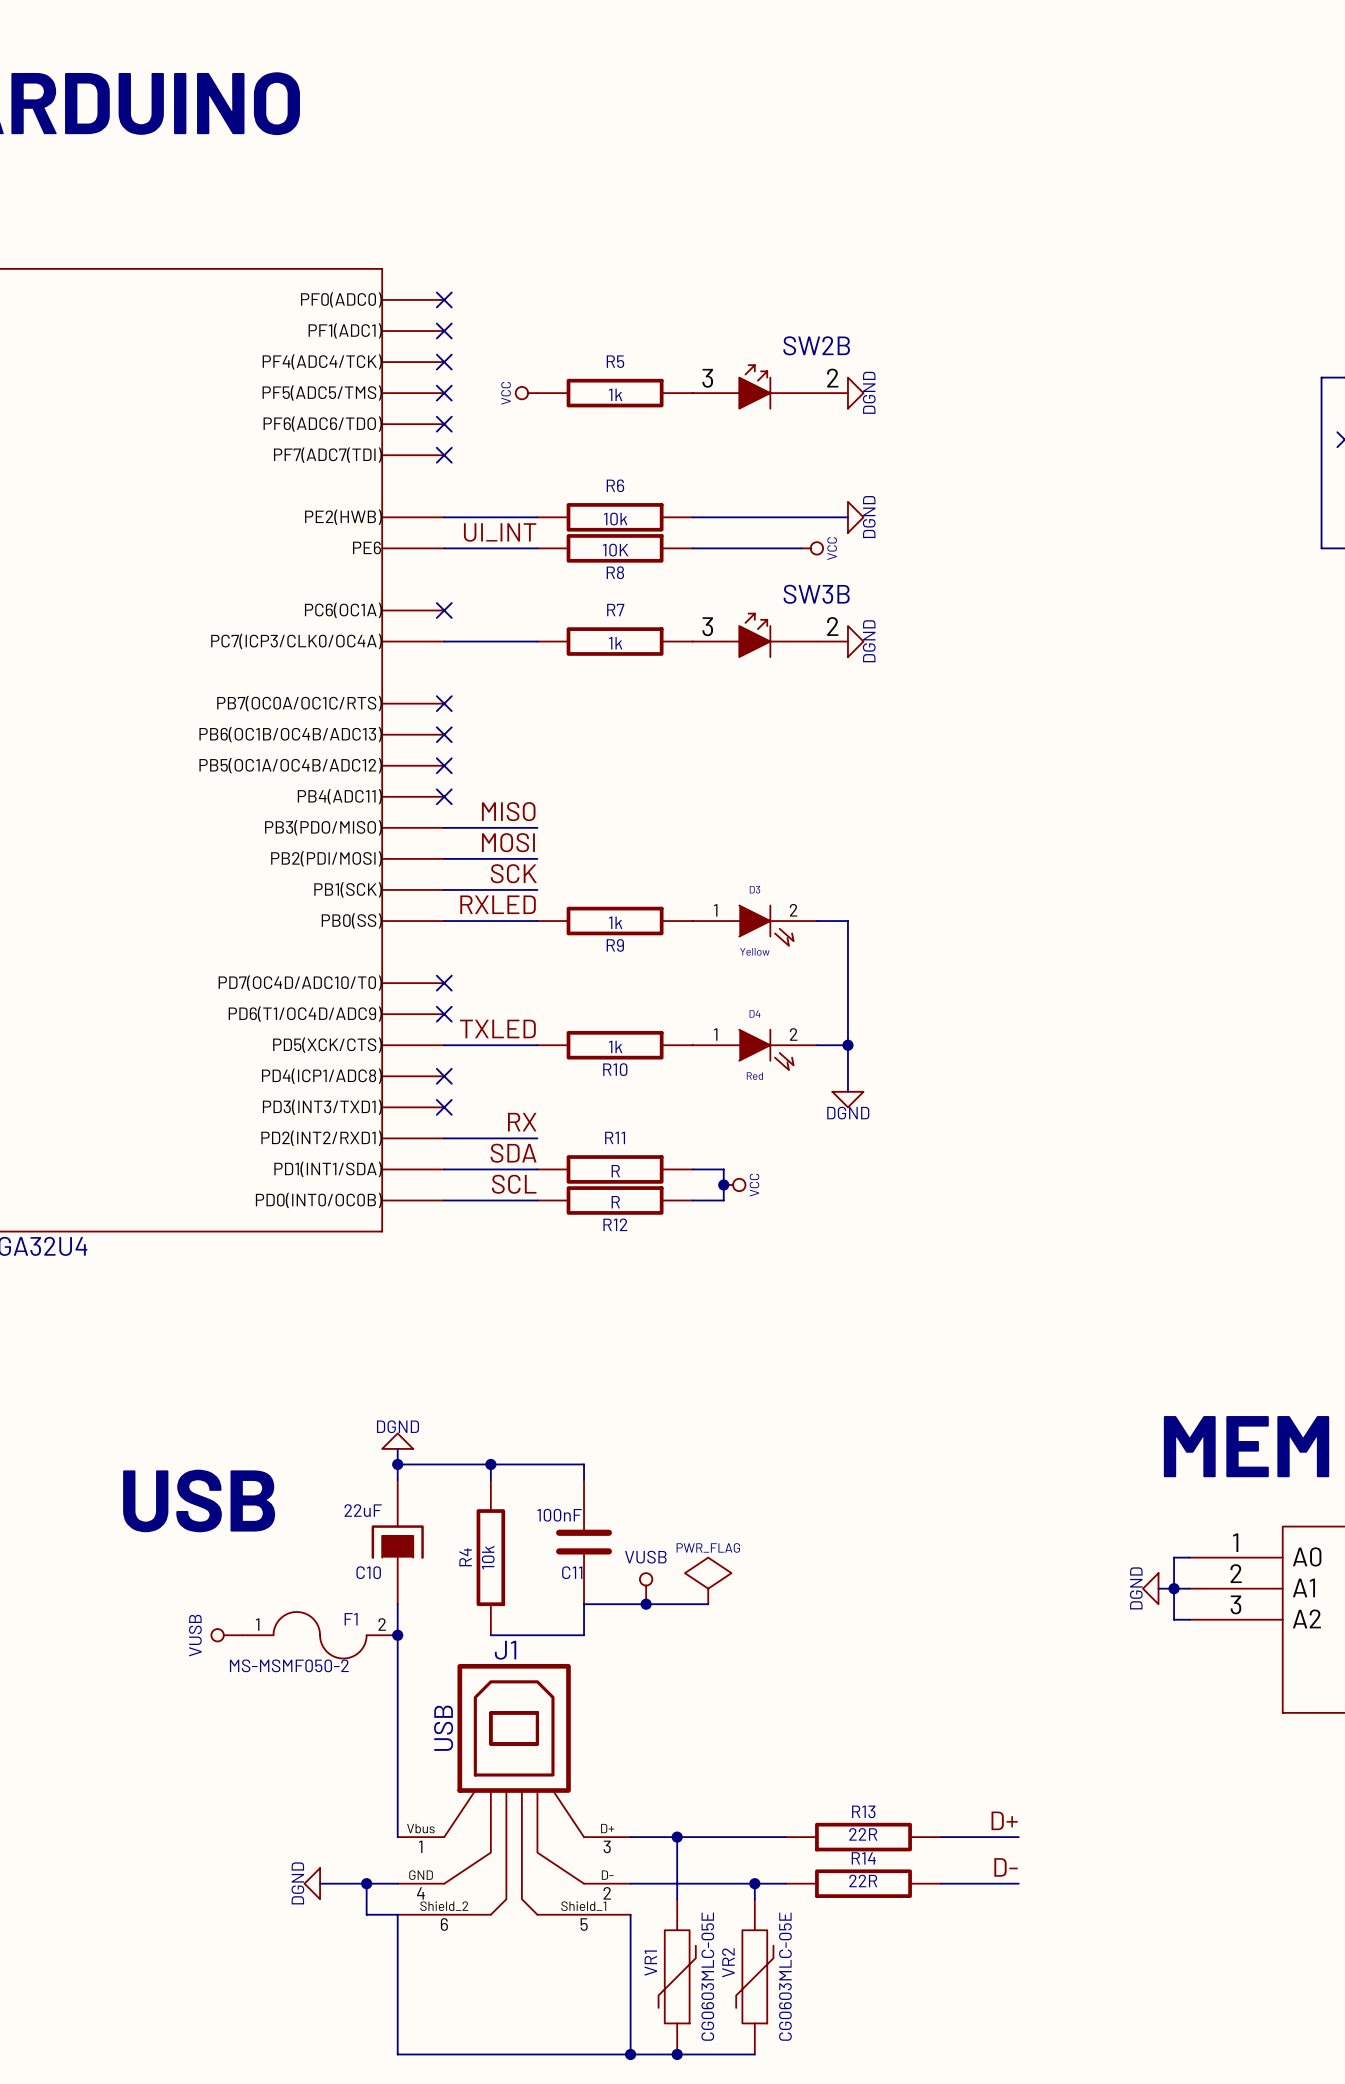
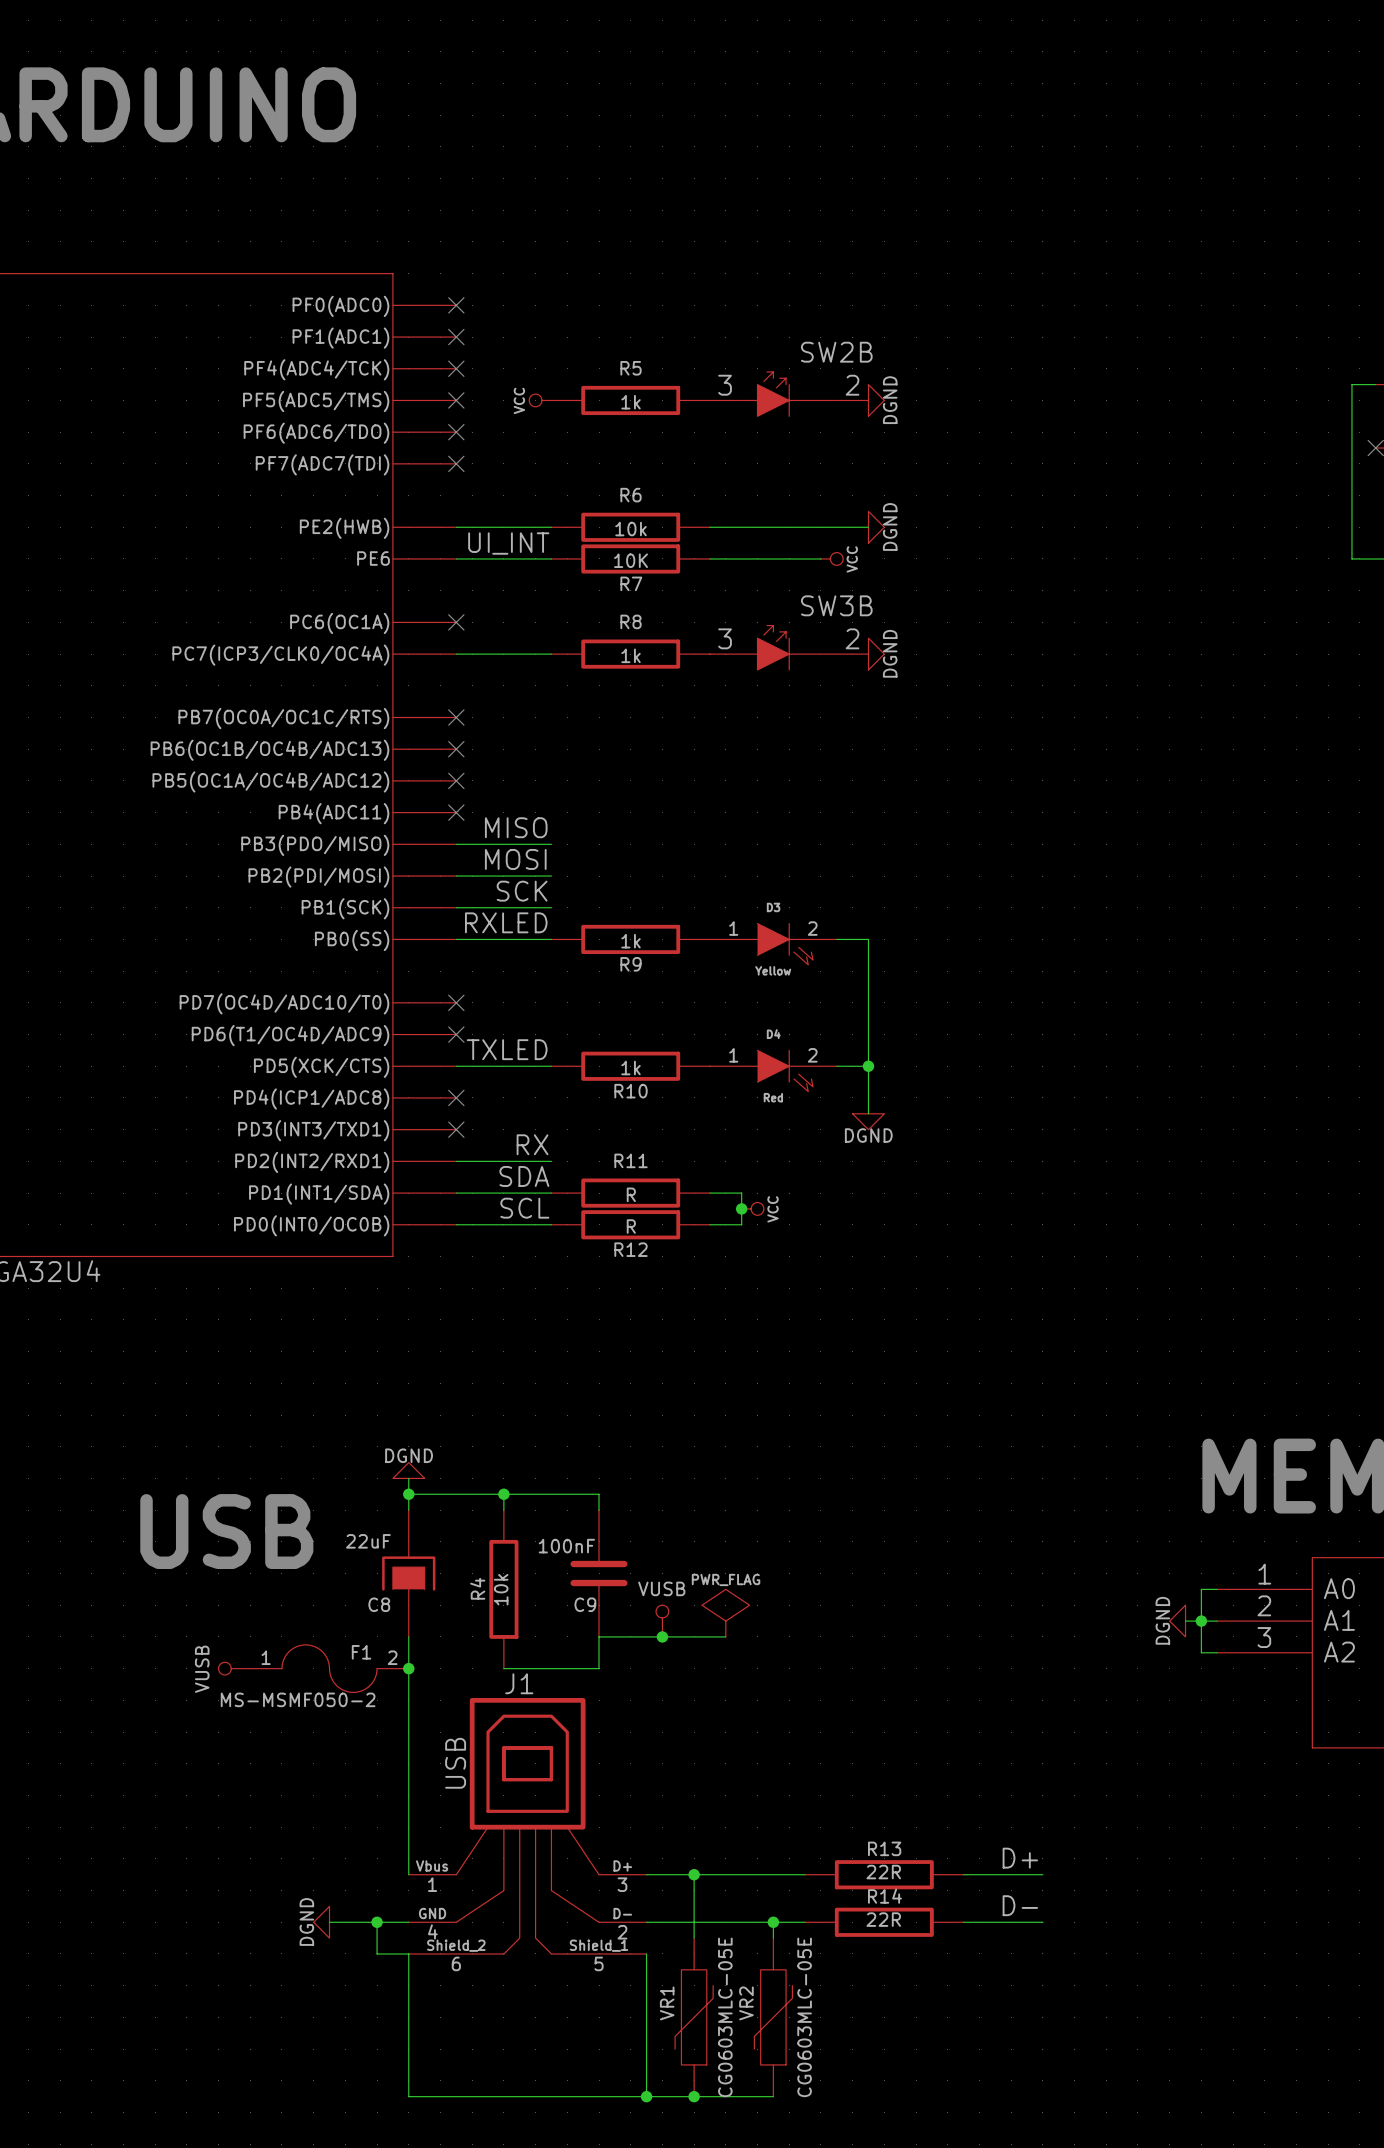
R8 name: R8 (615, 572) -> R7 (631, 583)
R7 name: R7 (615, 610) -> R8 (631, 621)
C10 name: C10 (368, 1572) -> C8 (379, 1604)
C11 name: C11 (572, 1572) -> C9 (585, 1604)

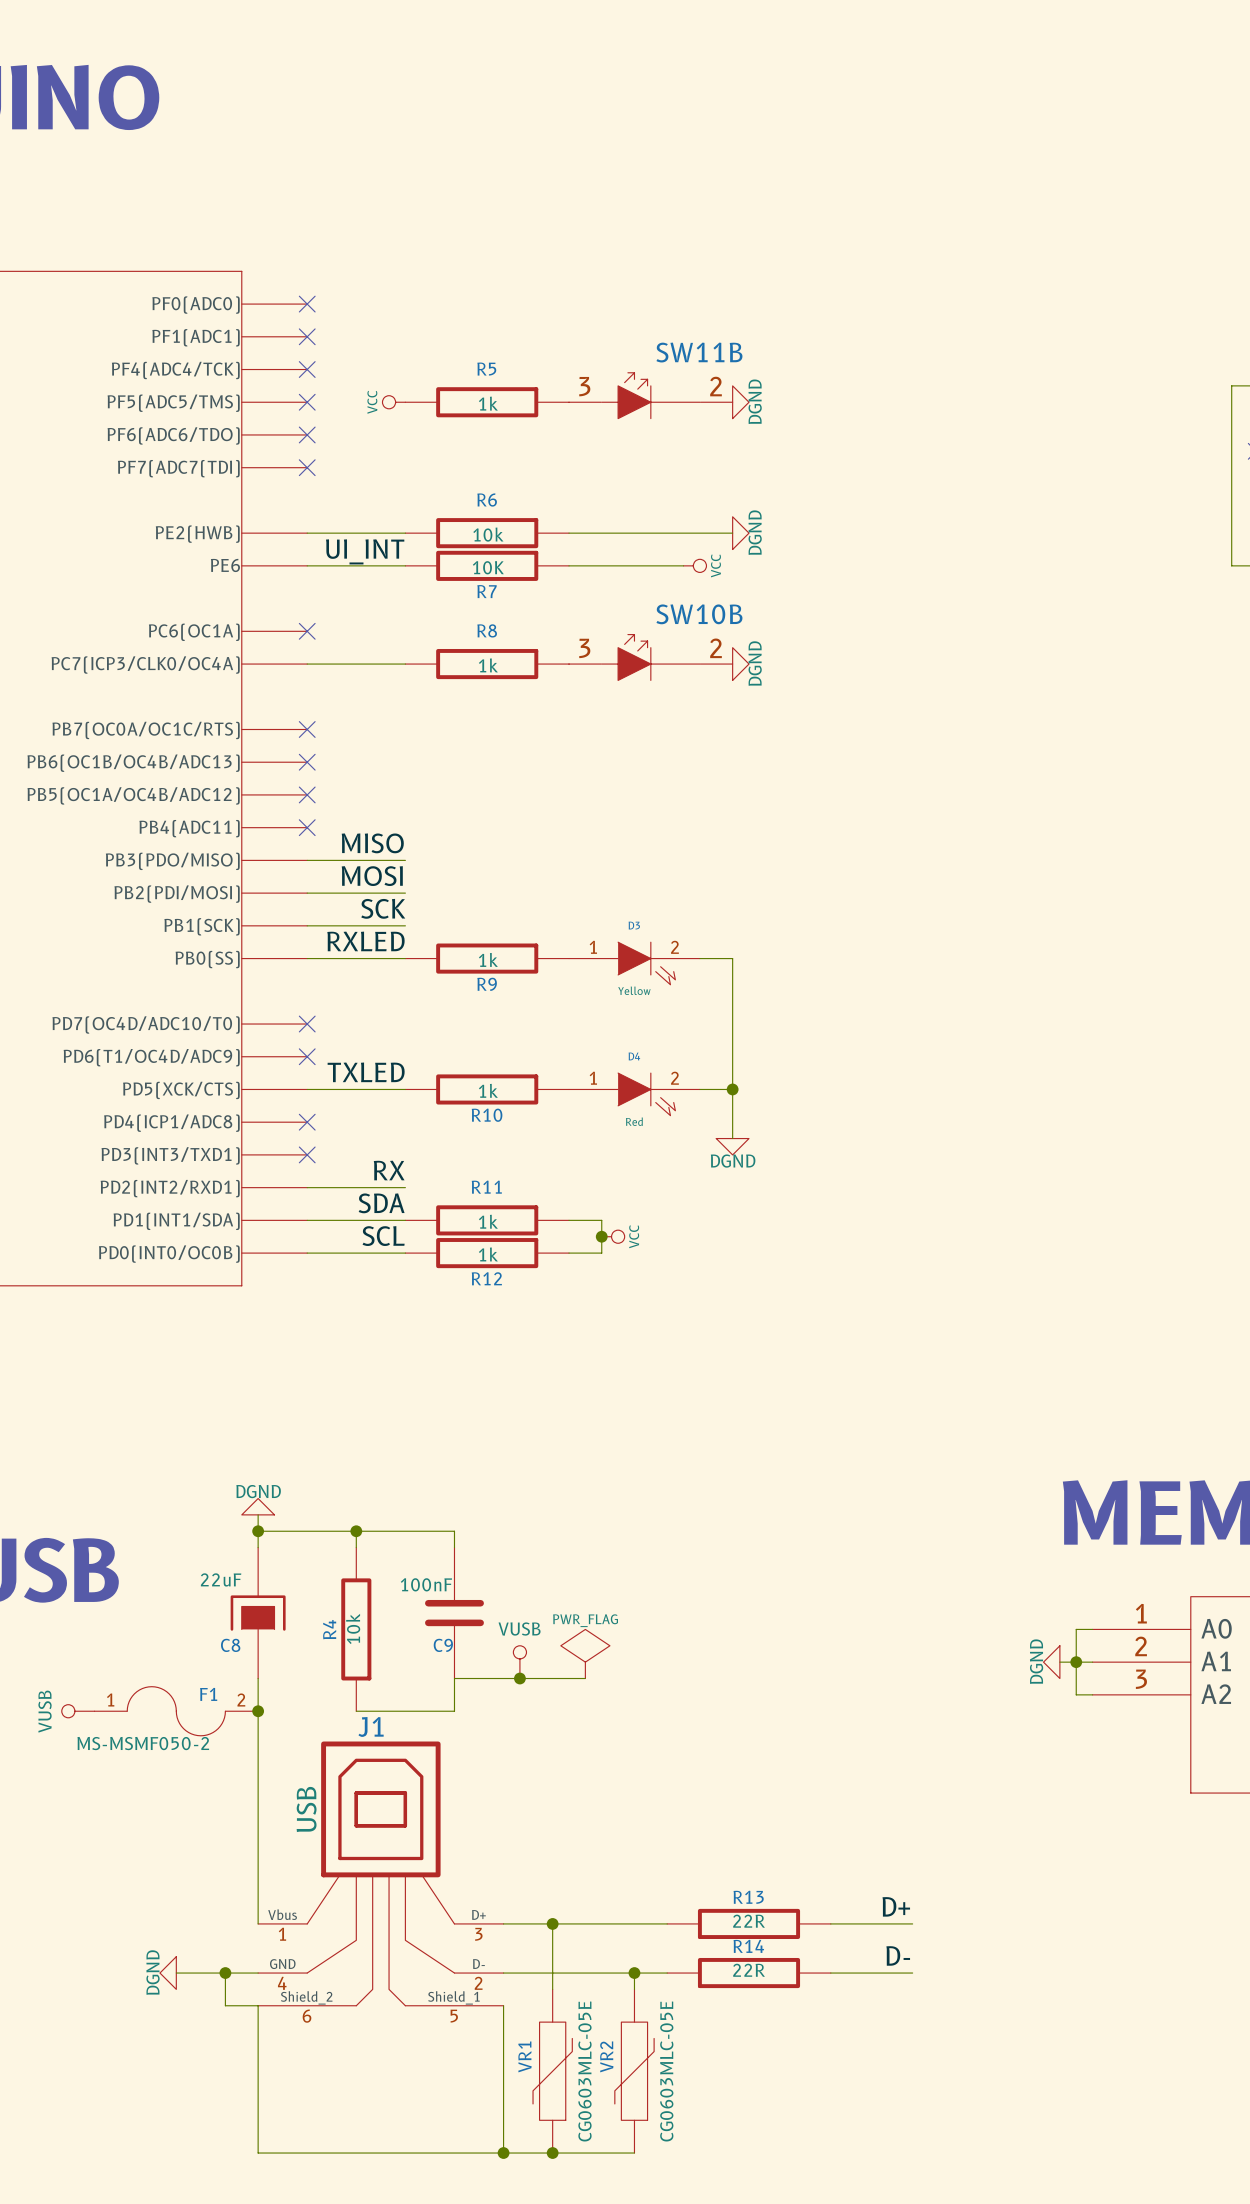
SW2B name: SW2B (836, 352) -> SW11B (699, 352)
SW3B name: SW3B (836, 605) -> SW10B (699, 614)
R11 value: R (631, 1194) -> 1k (488, 1221)
R12 value: R (631, 1226) -> 1k (488, 1254)

